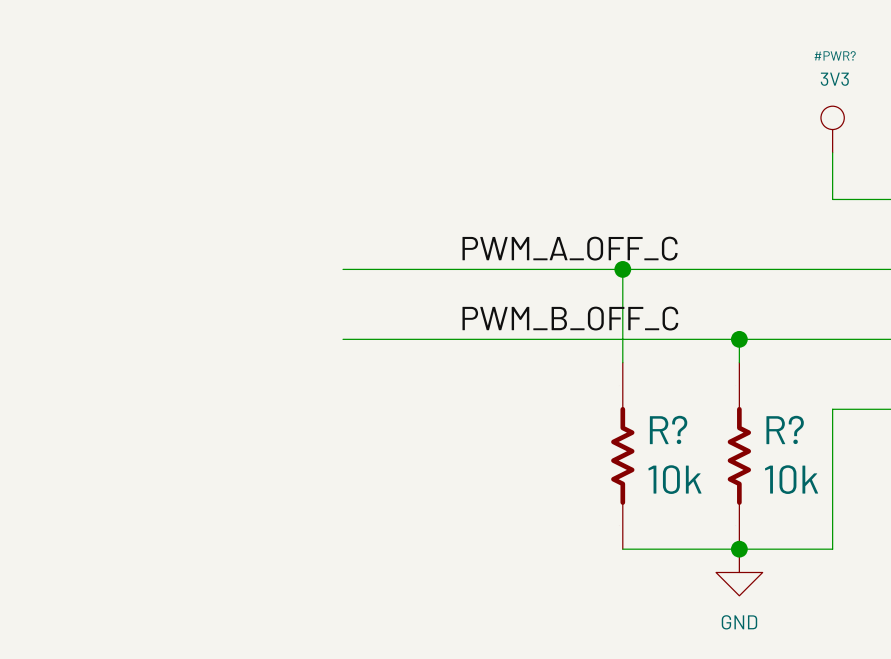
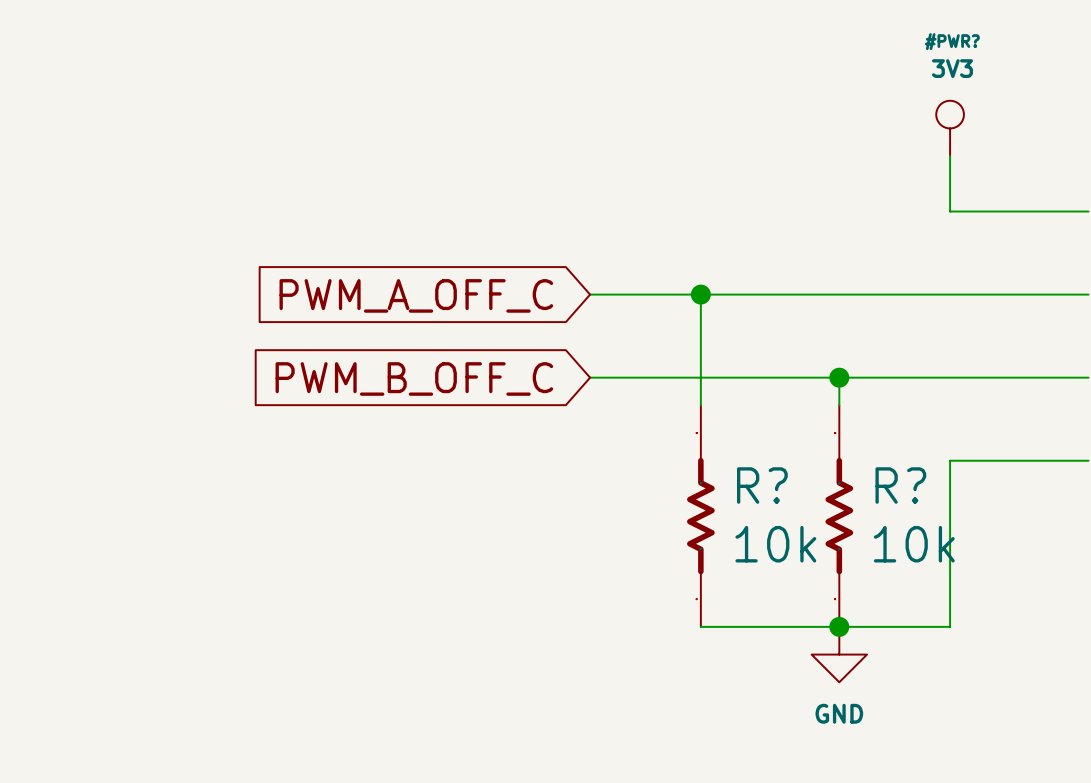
label: PWM_A_OFF_C (570, 248) -> none
wire: (343, 269) (529, 269) -> none
global label: none -> PWM_A_OFF_C (416, 295)
label: PWM_B_OFF_C (570, 318) -> none
wire: (343, 339) (529, 339) -> none
global label: none -> PWM_B_OFF_C (414, 378)

